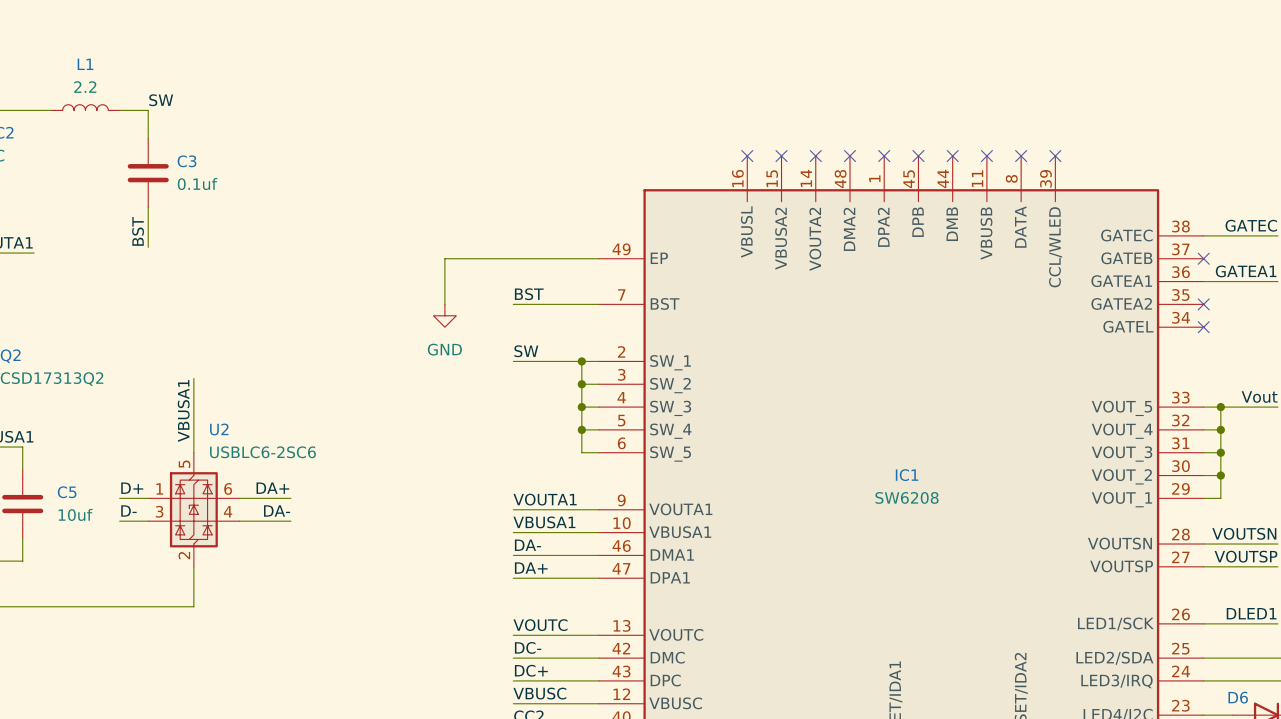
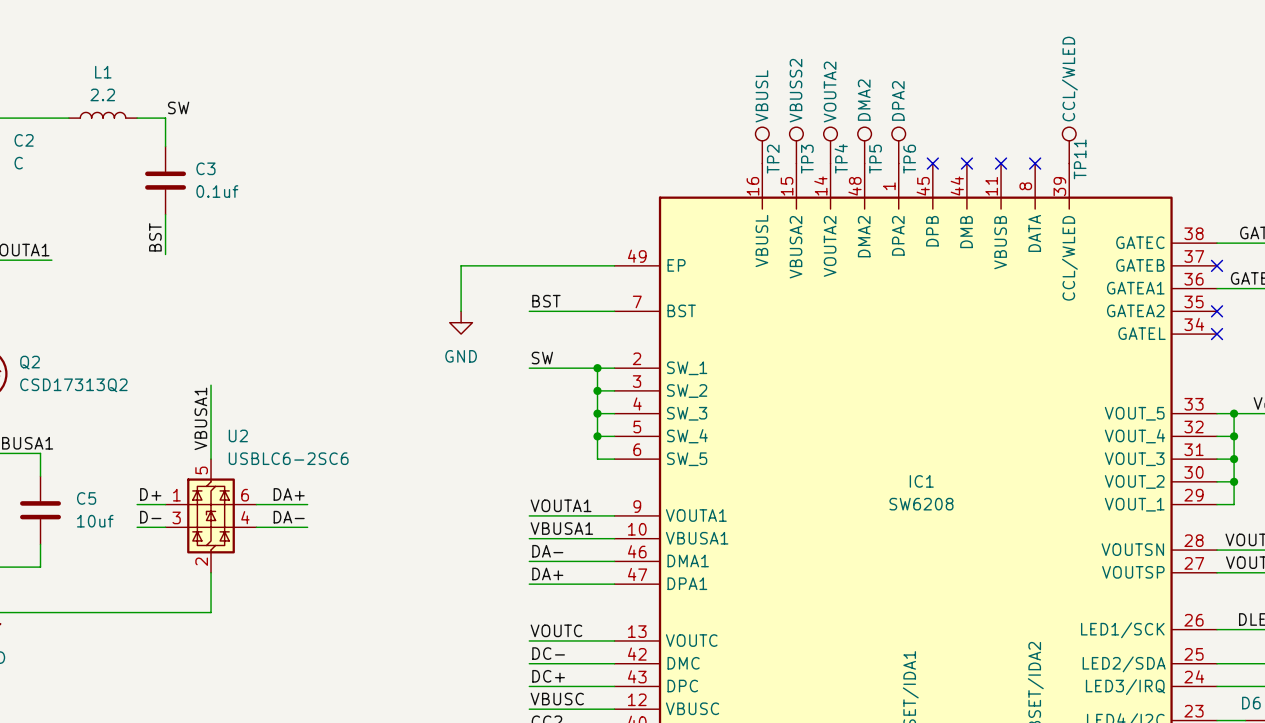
TP2: none -> VBUSL (762, 145)
TP3: none -> VBUSS2 (796, 145)
TP4: none -> VOUTA2 (830, 145)
TP5: none -> DMA2 (864, 145)
TP6: none -> DPA2 (898, 145)
TP11: none -> CCL/WLED (1069, 145)
no-connect mark: (747, 156) -> none
no-connect mark: (781, 156) -> none
no-connect mark: (815, 156) -> none
no-connect mark: (849, 156) -> none
no-connect mark: (884, 156) -> none
no-connect mark: (1055, 156) -> none

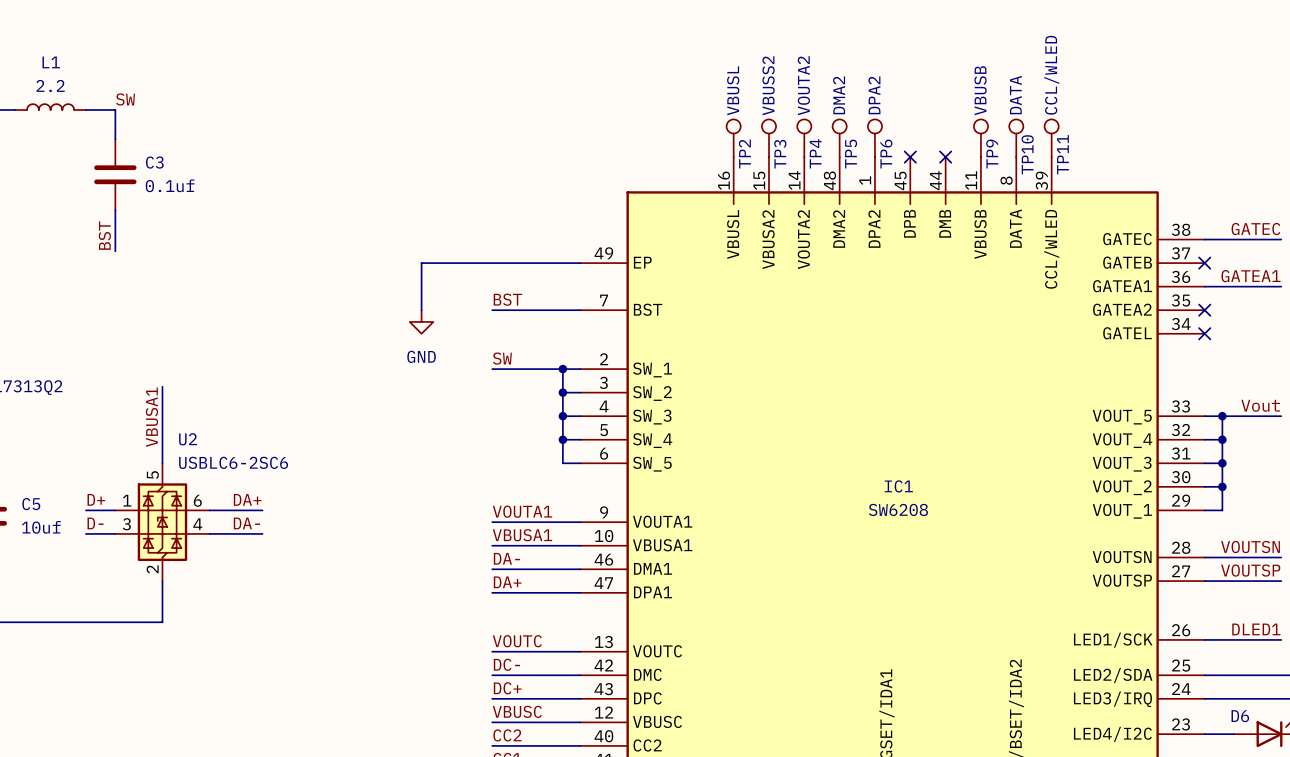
TP9: none -> VBUSB (980, 138)
TP10: none -> DATA (1016, 138)
no-connect mark: (1001, 163) -> none
no-connect mark: (1035, 163) -> none

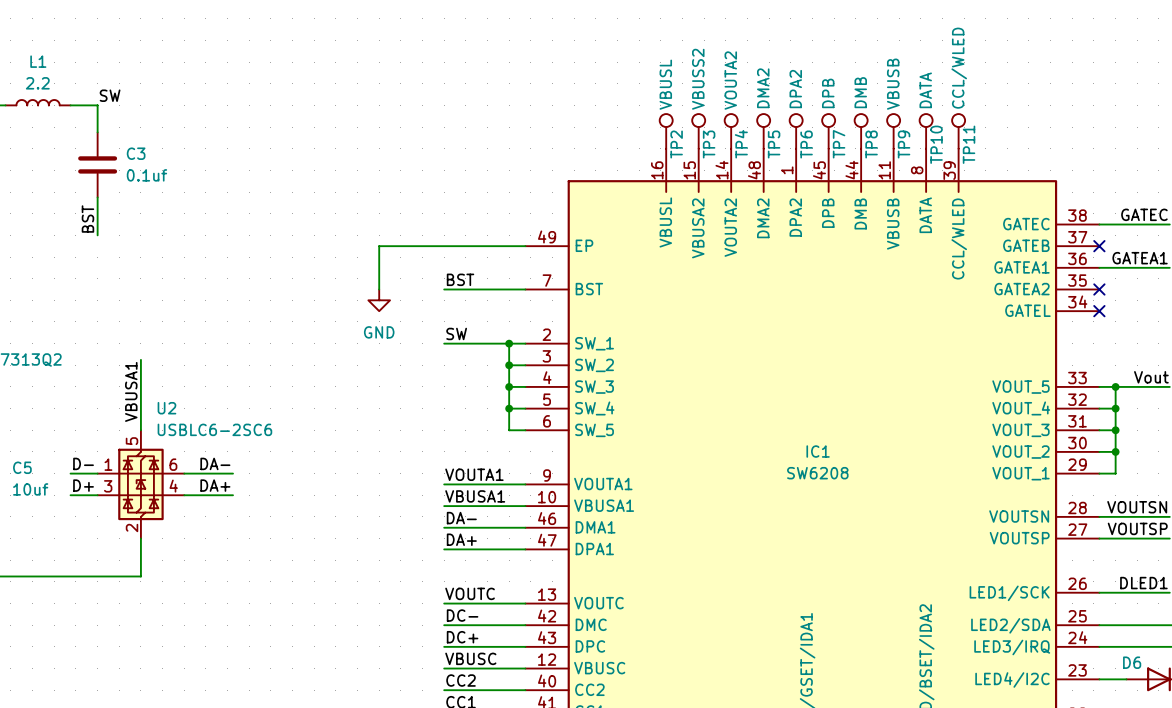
TP7: none -> DPB (828, 131)
TP8: none -> DMB (861, 131)
no-connect mark: (910, 157) -> none
no-connect mark: (945, 157) -> none
label: D+ (96, 499) -> D- (83, 463)
label: DA+ (247, 499) -> DA- (215, 463)
label: D- (95, 523) -> D+ (83, 485)
label: DA- (246, 523) -> DA+ (215, 485)

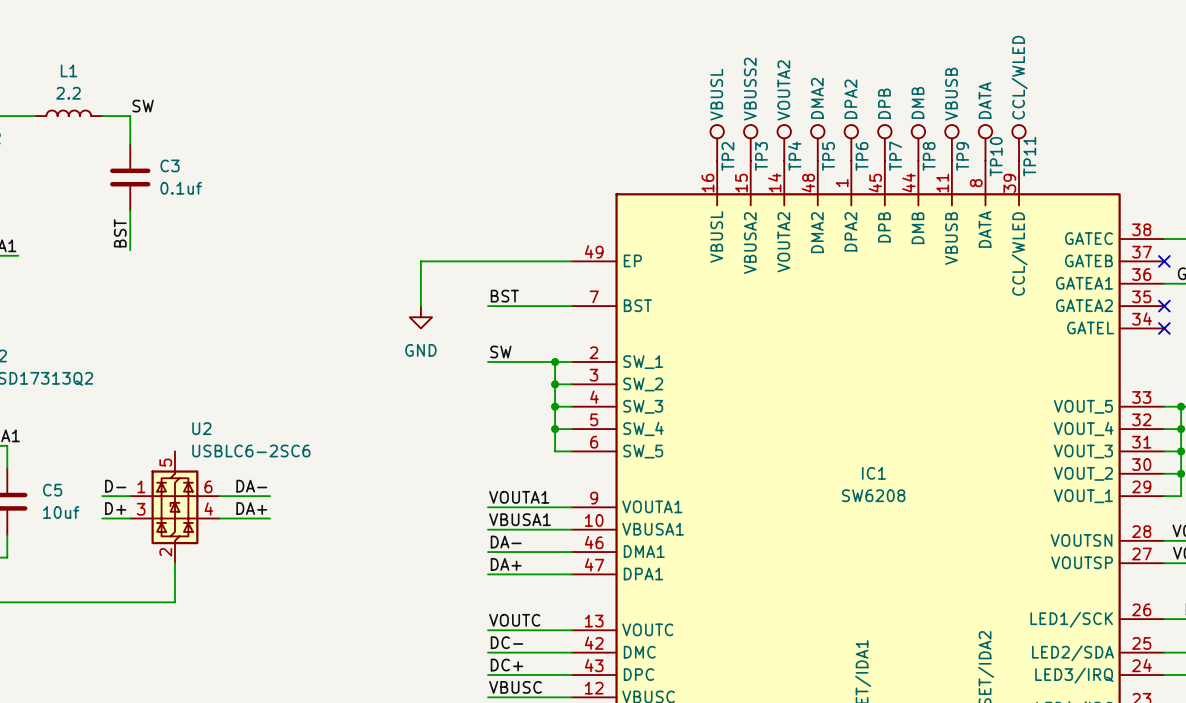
wire: (140, 359) (140, 430) -> none
label: VBUSA1 (131, 391) -> none

